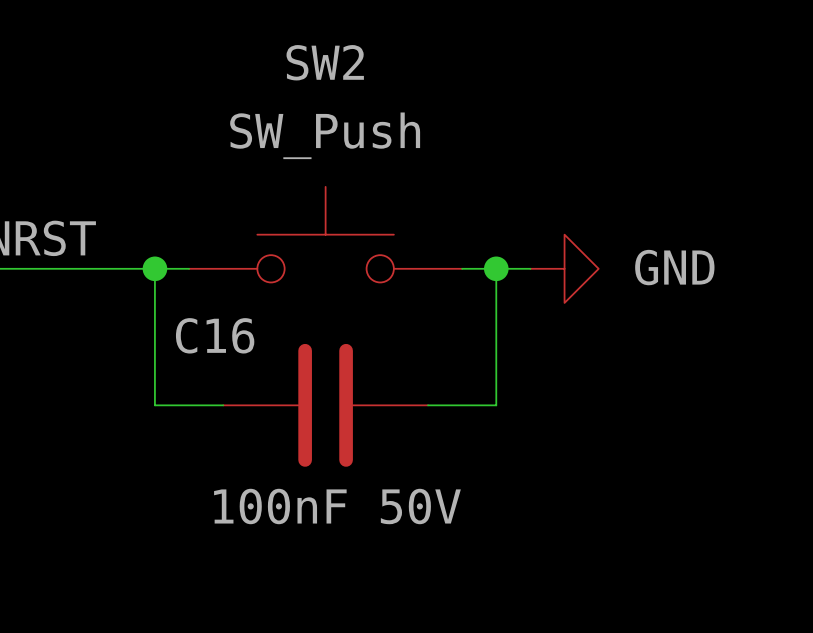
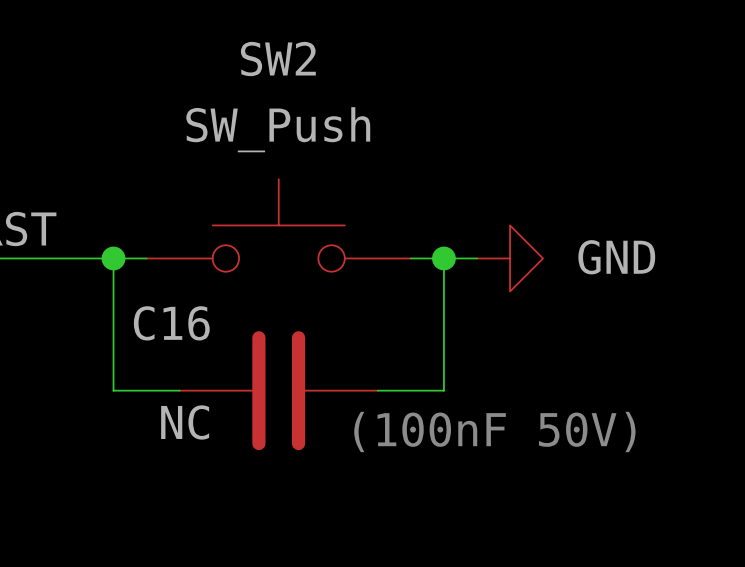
text: none -> (100nF 50V) (494, 431)
C16 value: 100nF 50V (337, 506) -> NC (185, 422)

